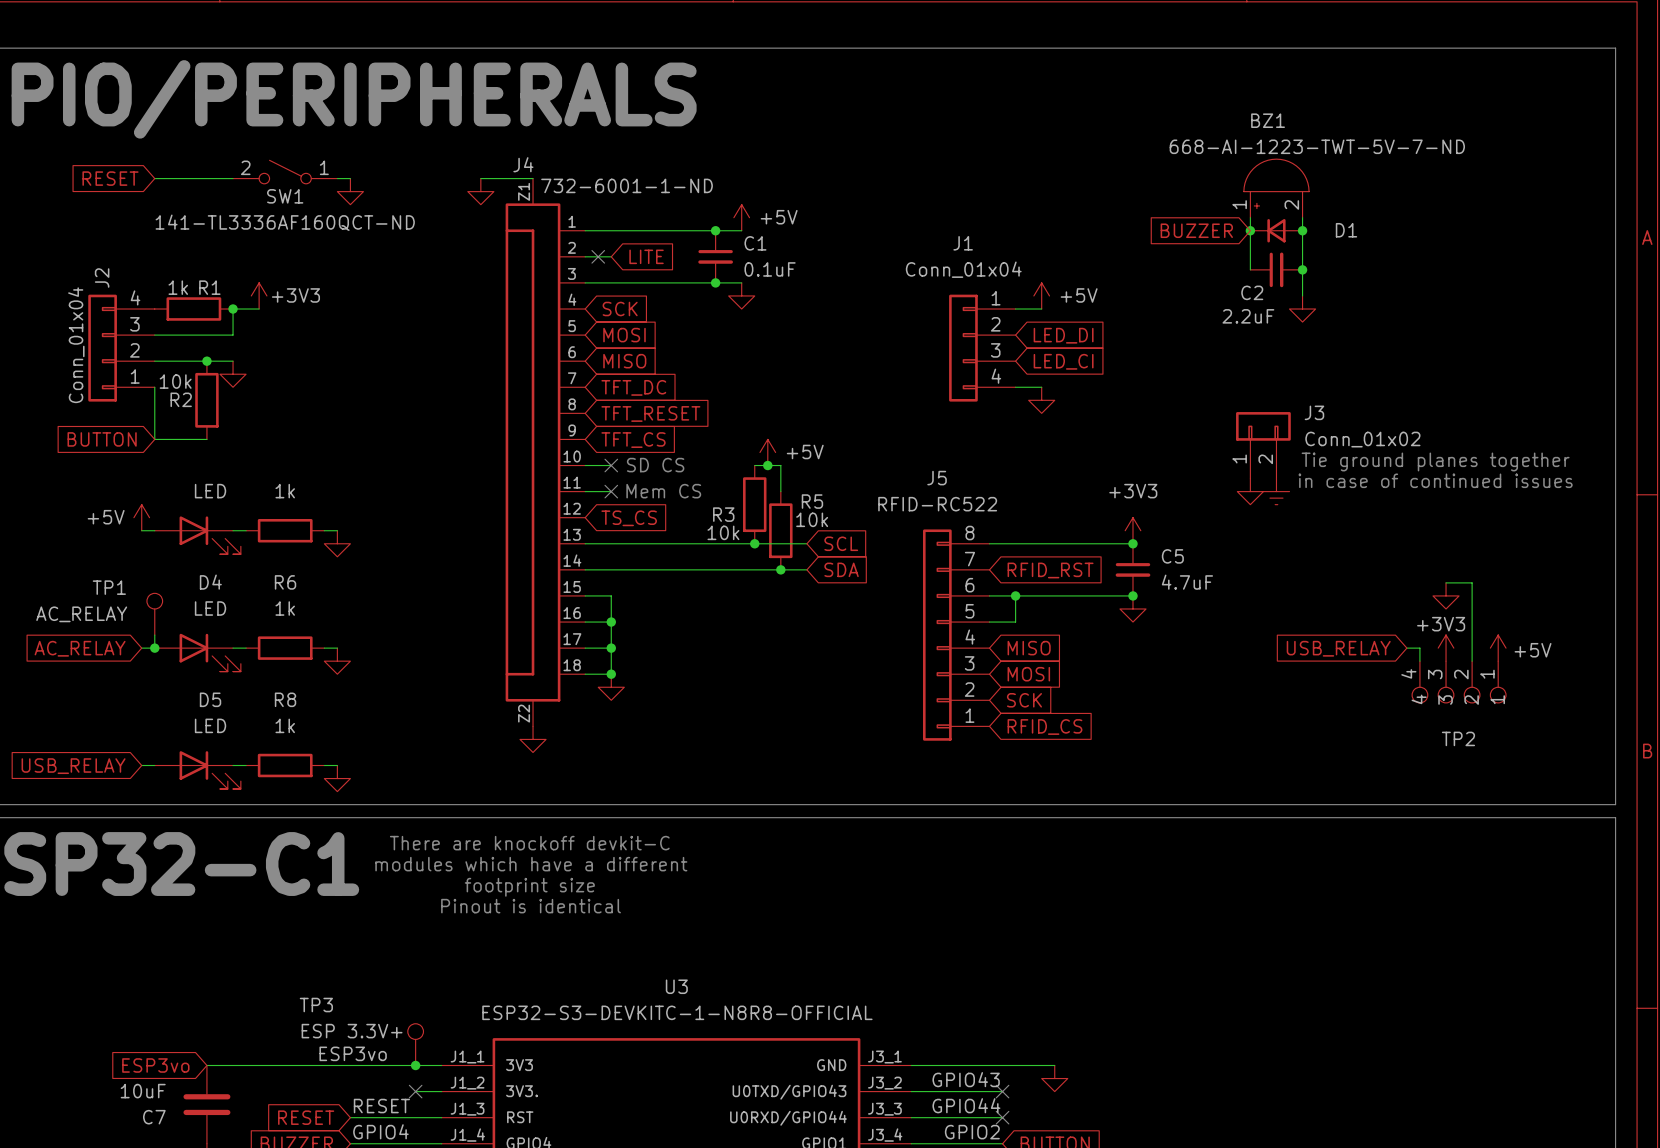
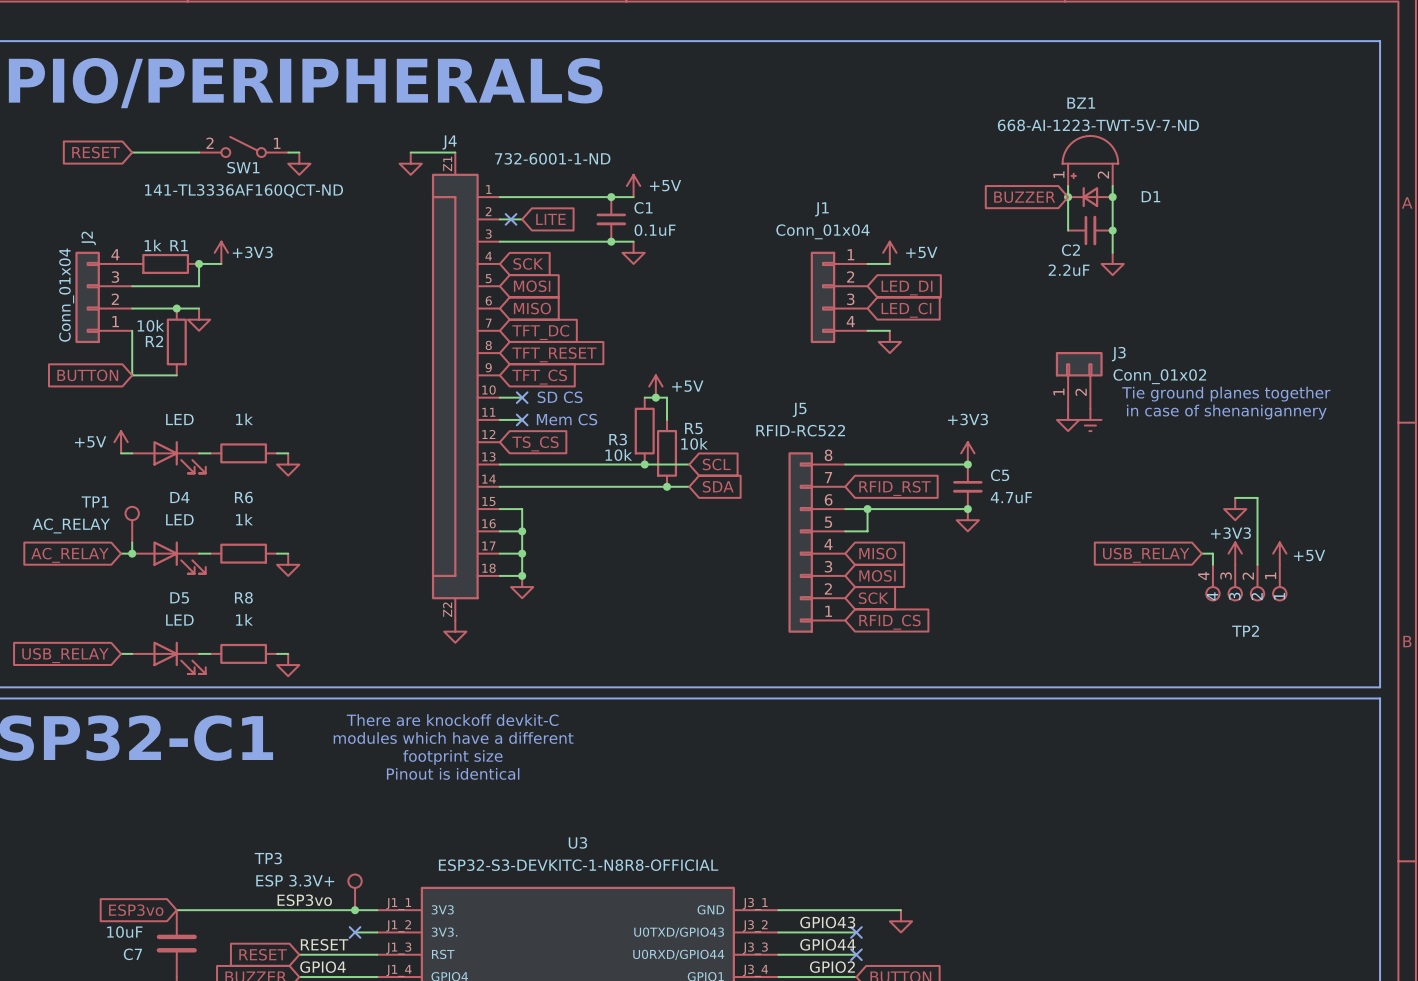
text: in case of continued issues (1435, 480) -> in case of shenanigannery (1226, 412)

